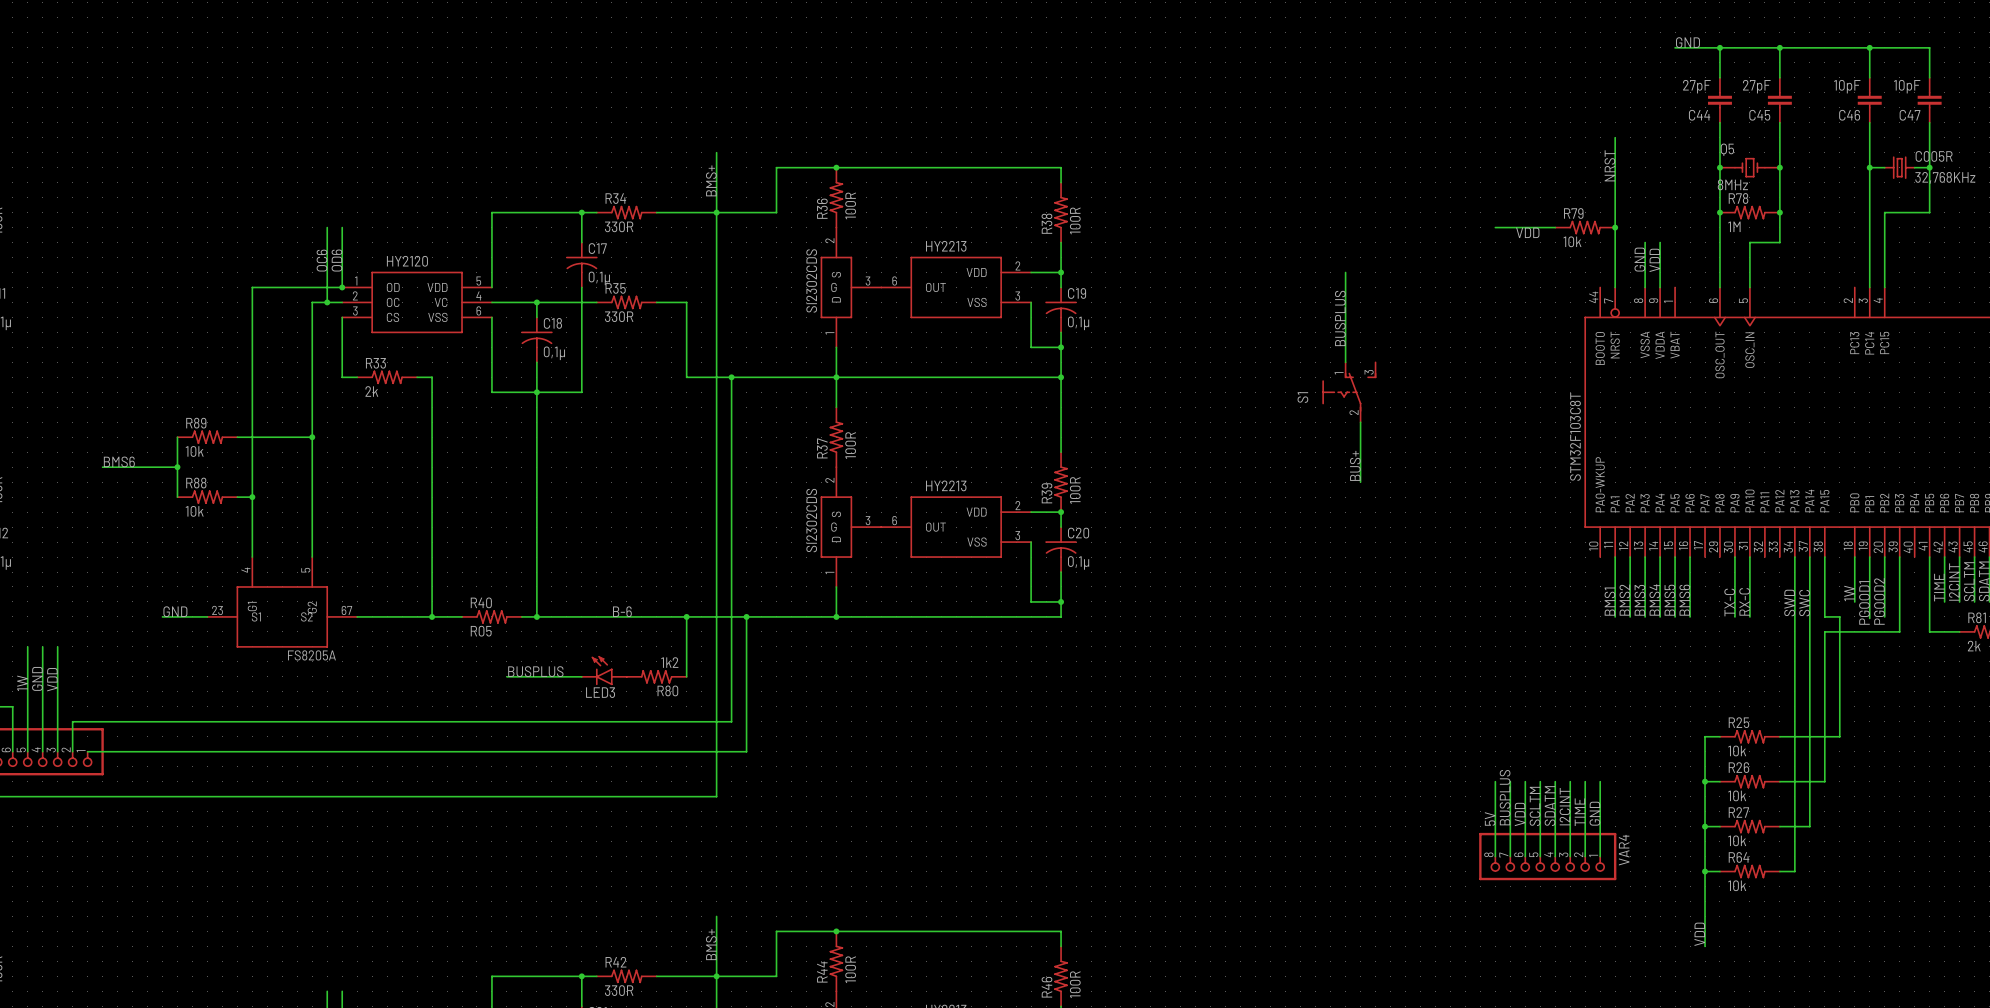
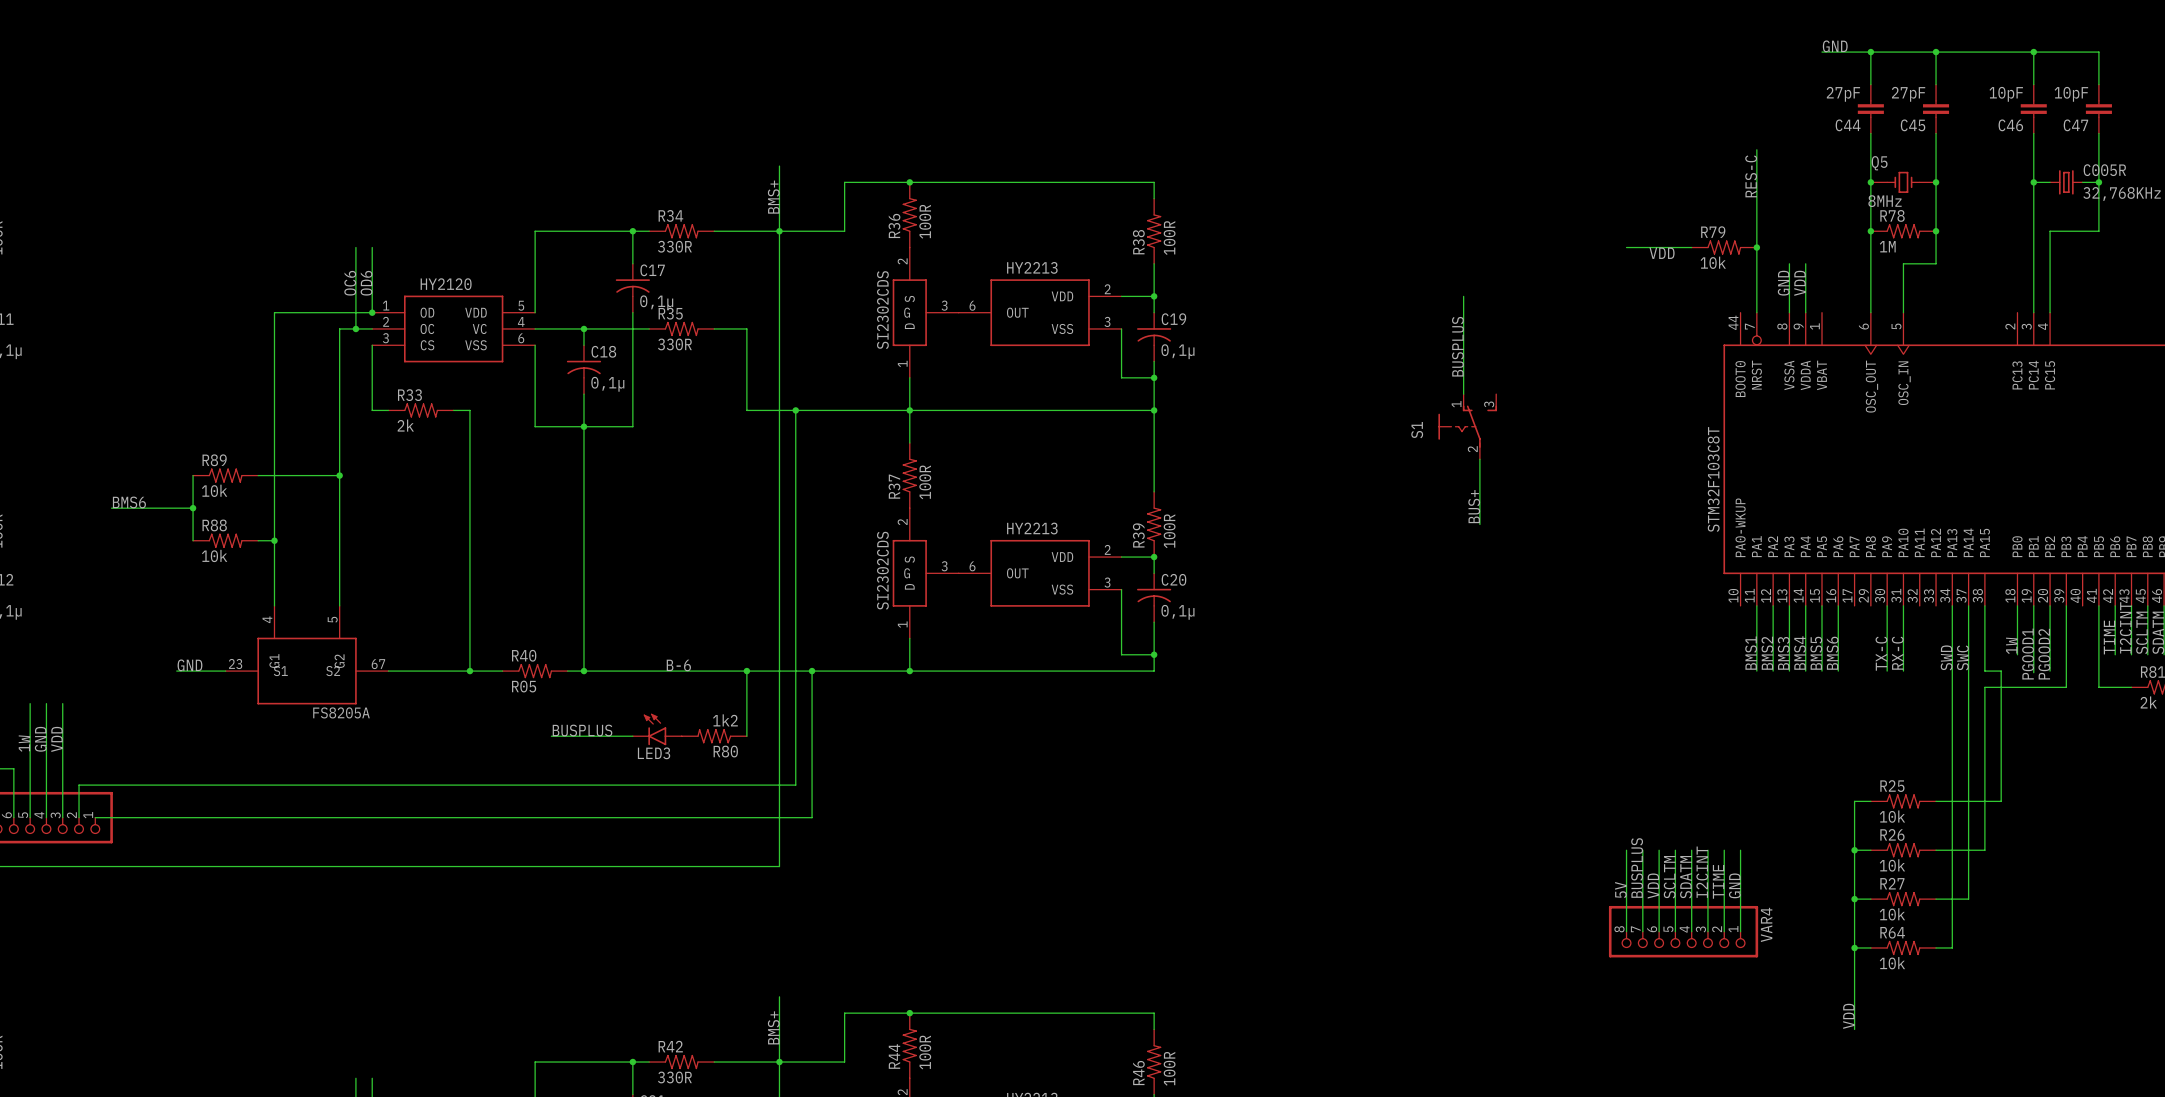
label: NRST (1609, 165) -> RES-C (1751, 176)

